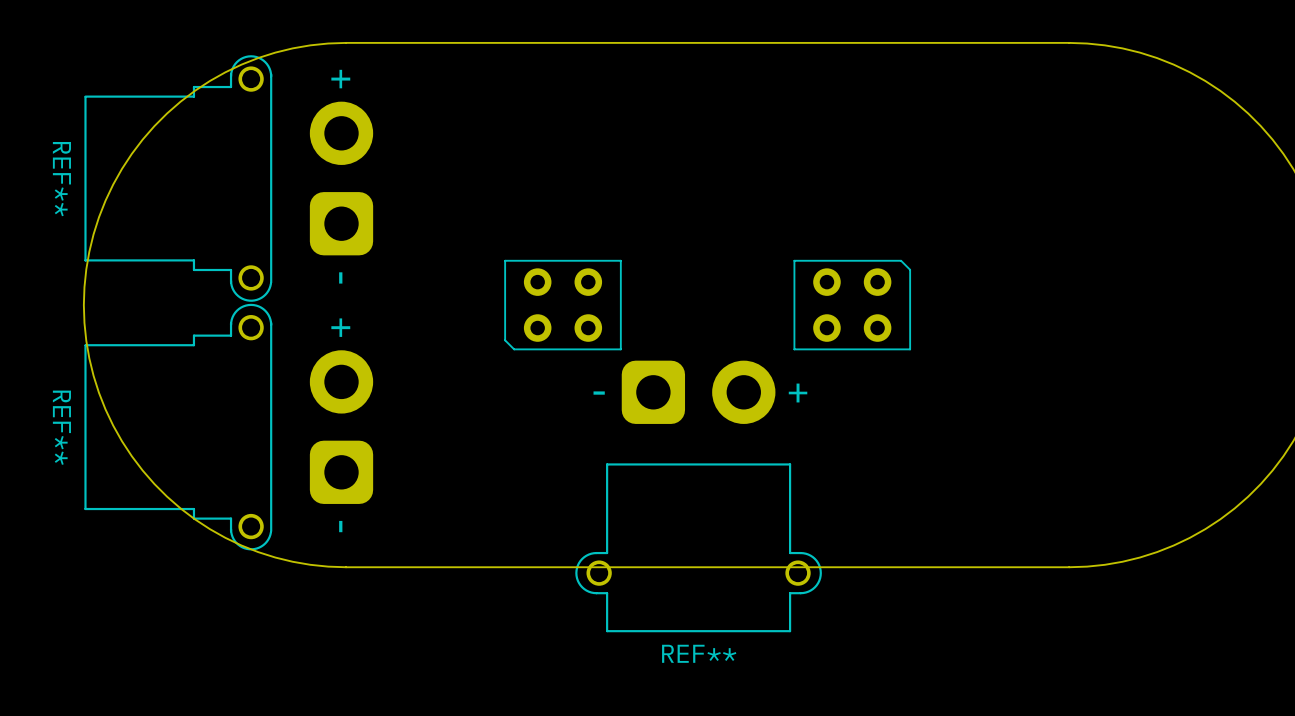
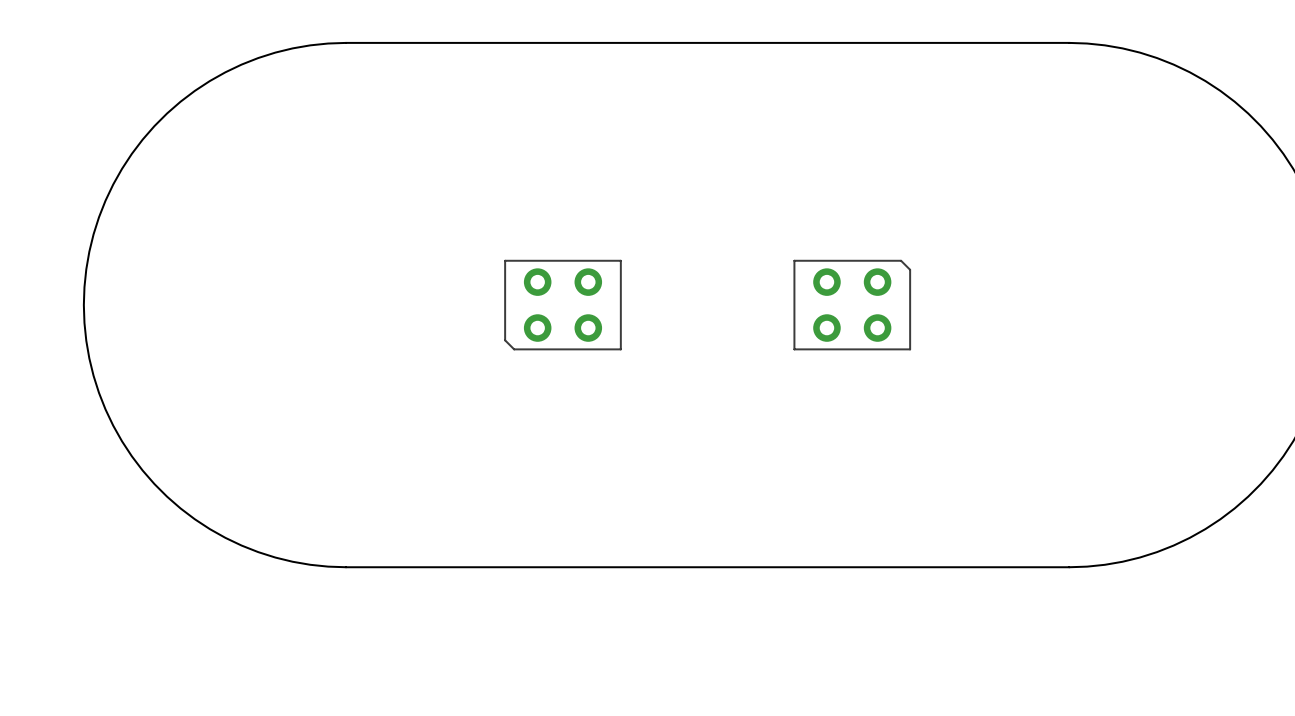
REF**: (228, 178) -> none
REF**: (228, 427) -> none
REF**: (698, 496) -> none

